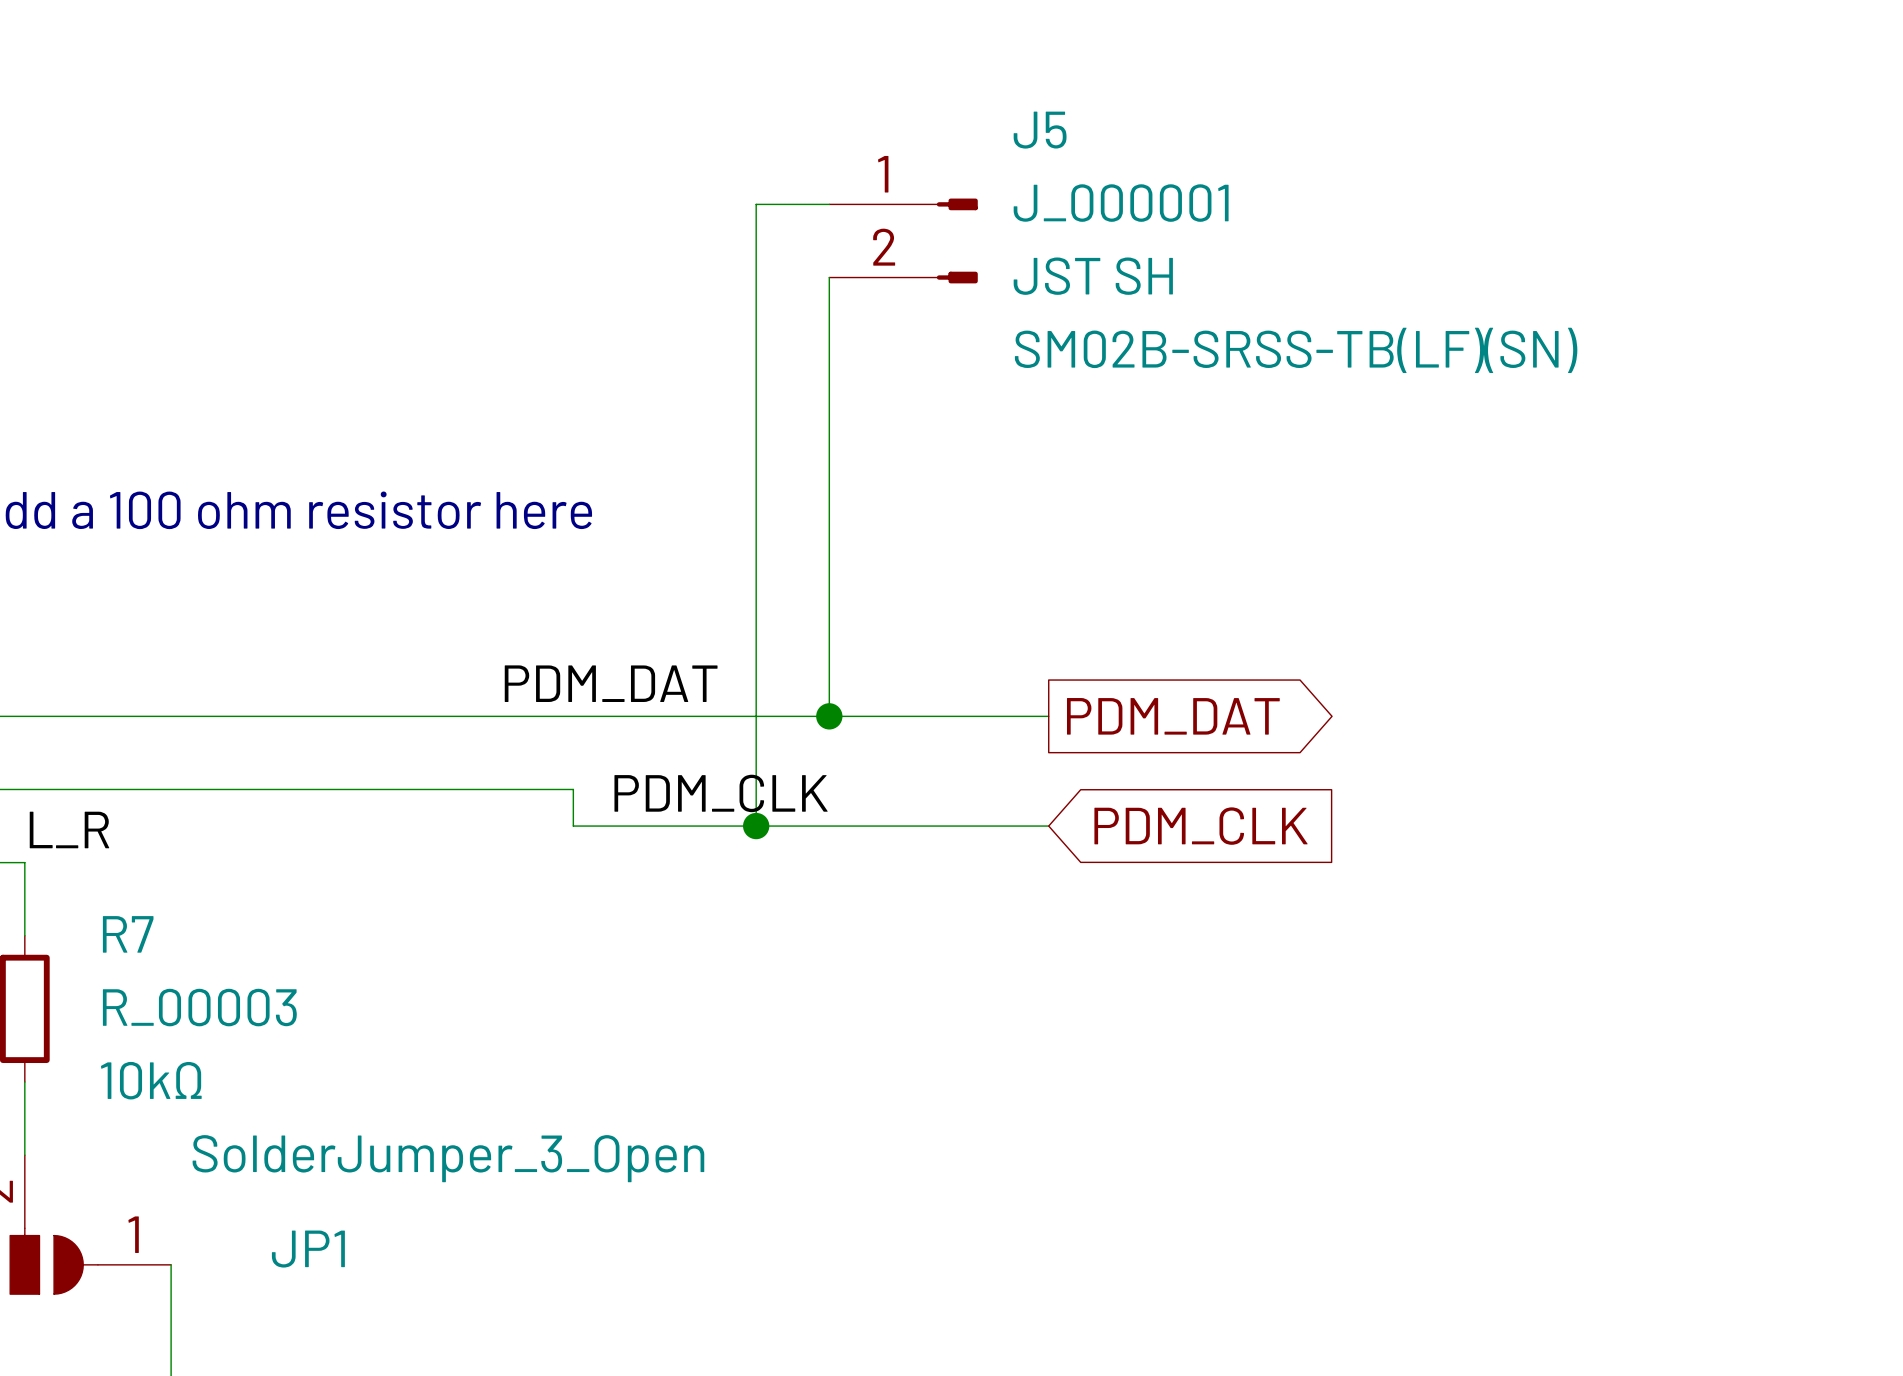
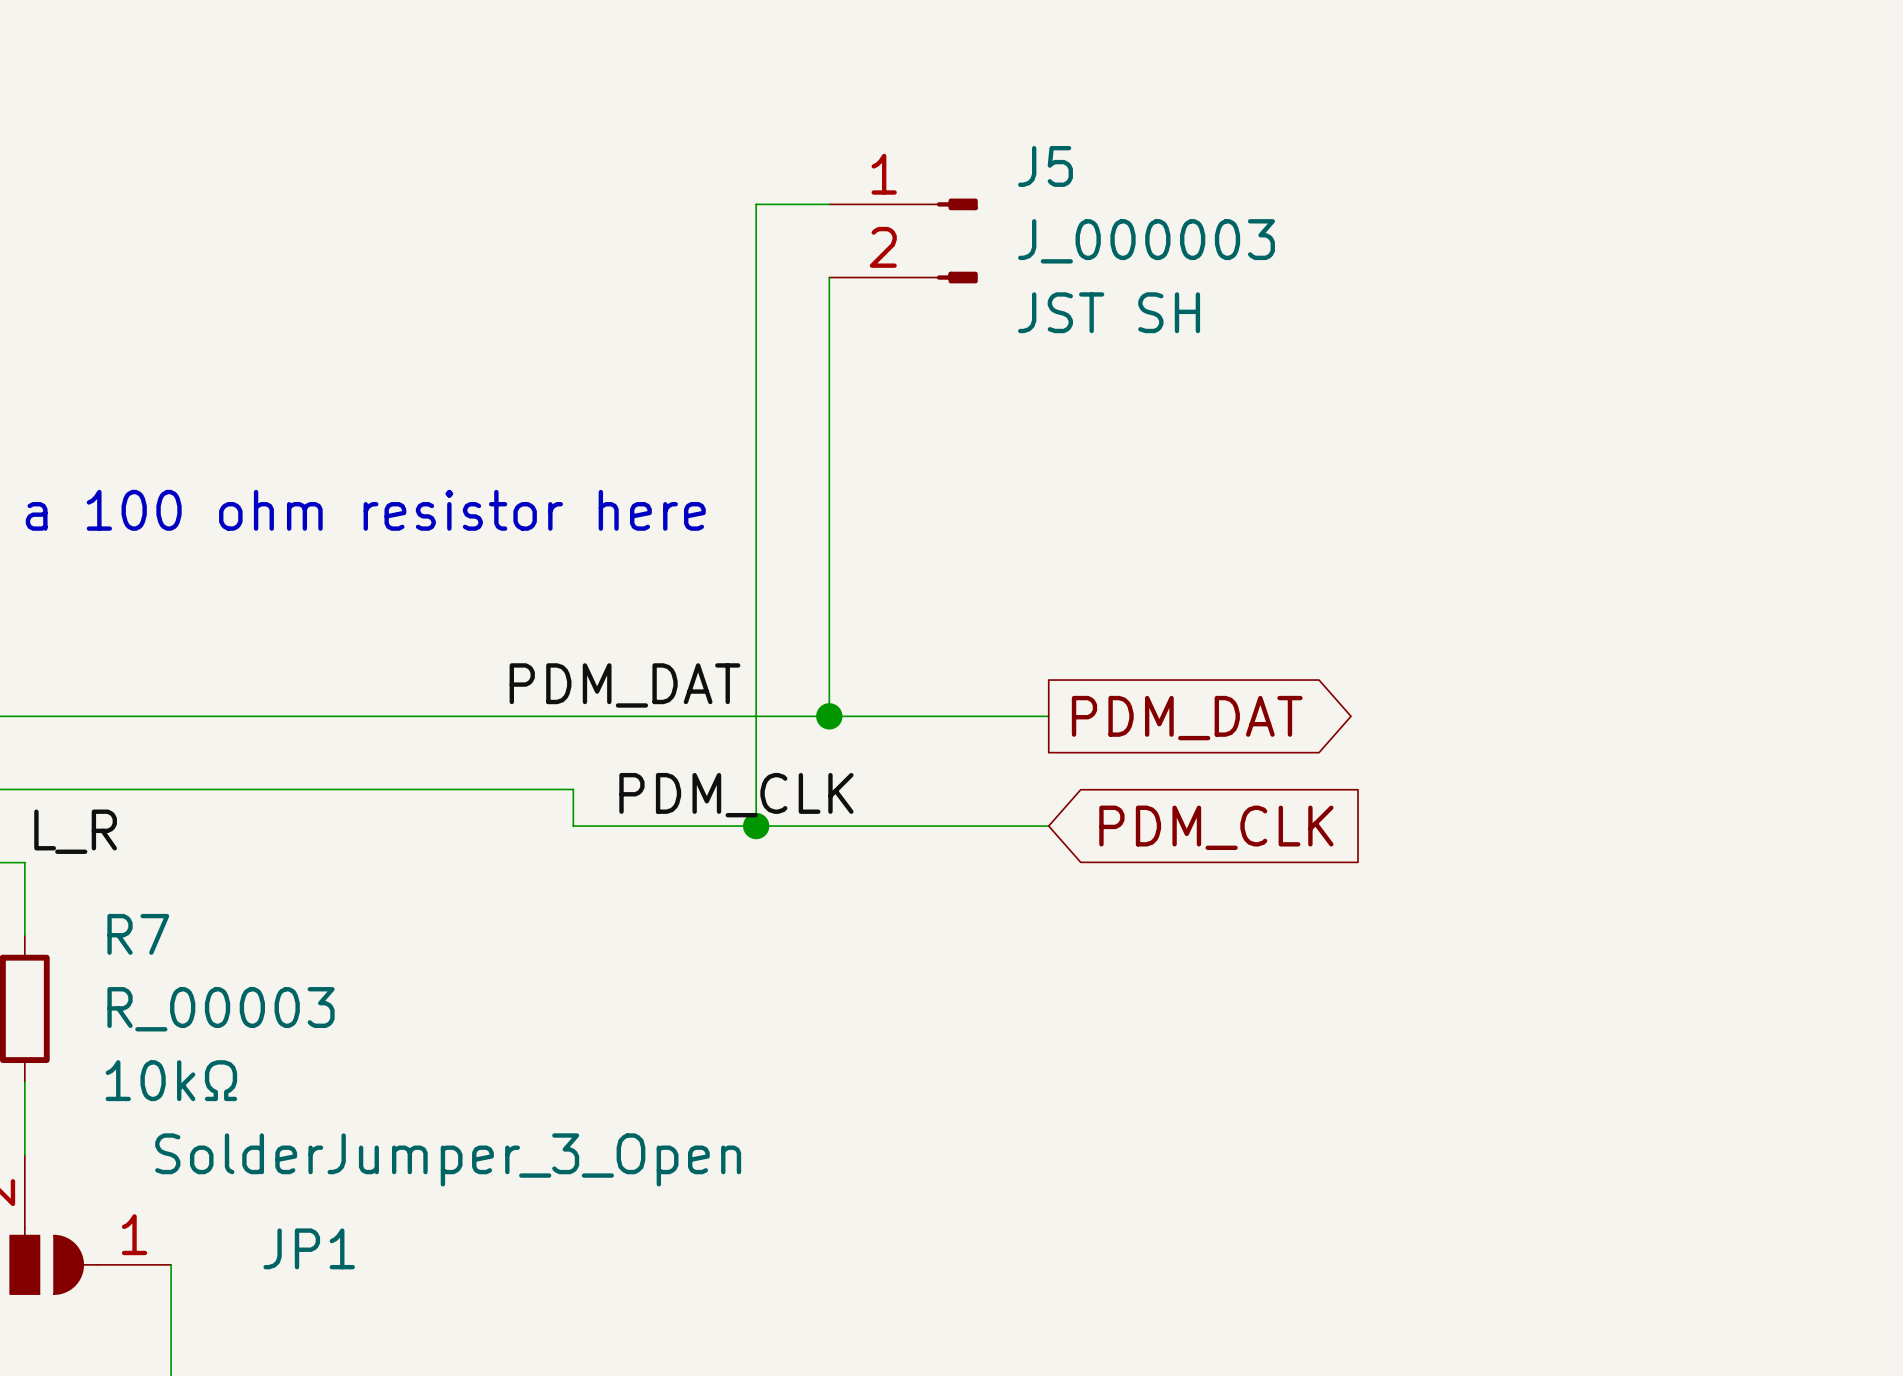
J5 name position: J5 (1040, 130) -> J5 (1045, 166)
J5 value: J_000001 (1121, 203) -> J_000003 (1146, 241)
J5 text position: JST SH (1093, 276) -> JST SH (1109, 312)
J5 text: SM02B-SRSS-TB(LF)(SN) (1296, 350) -> none

